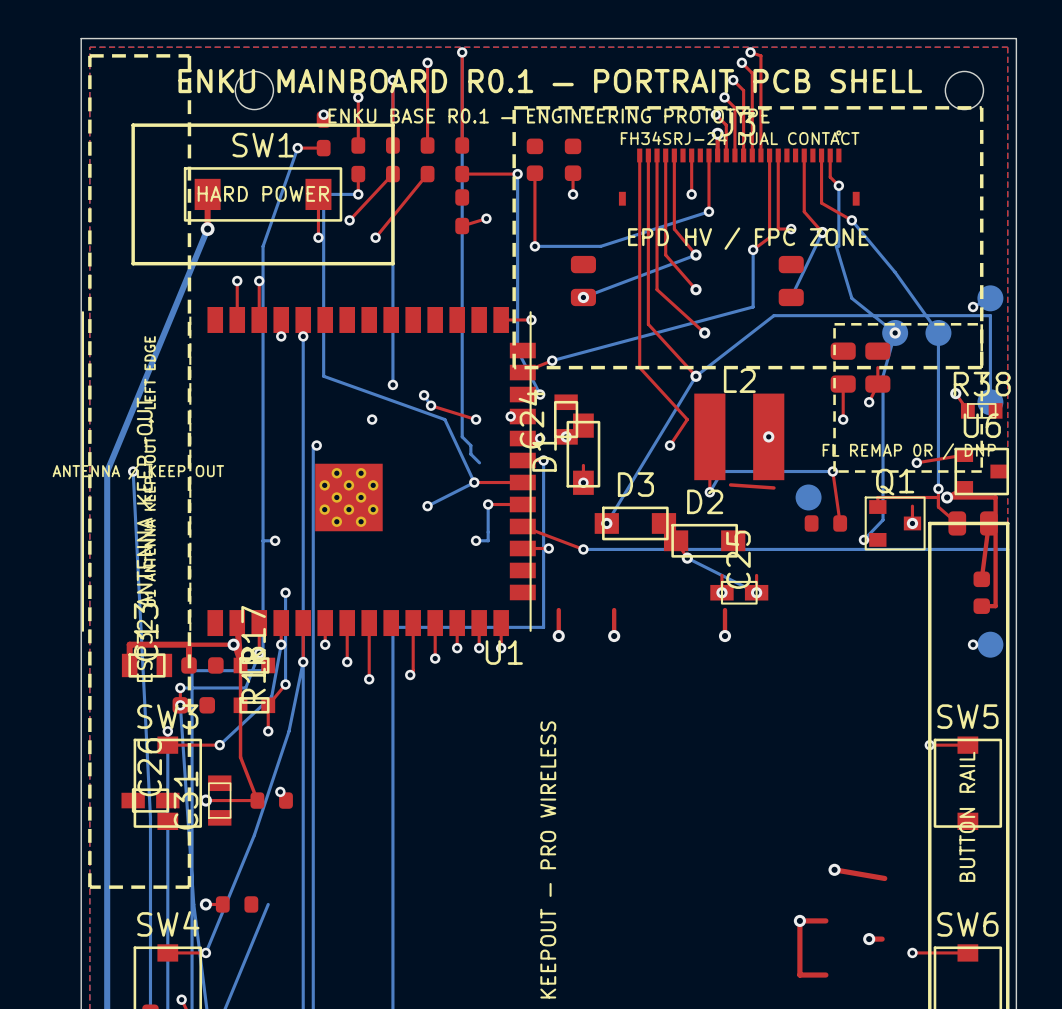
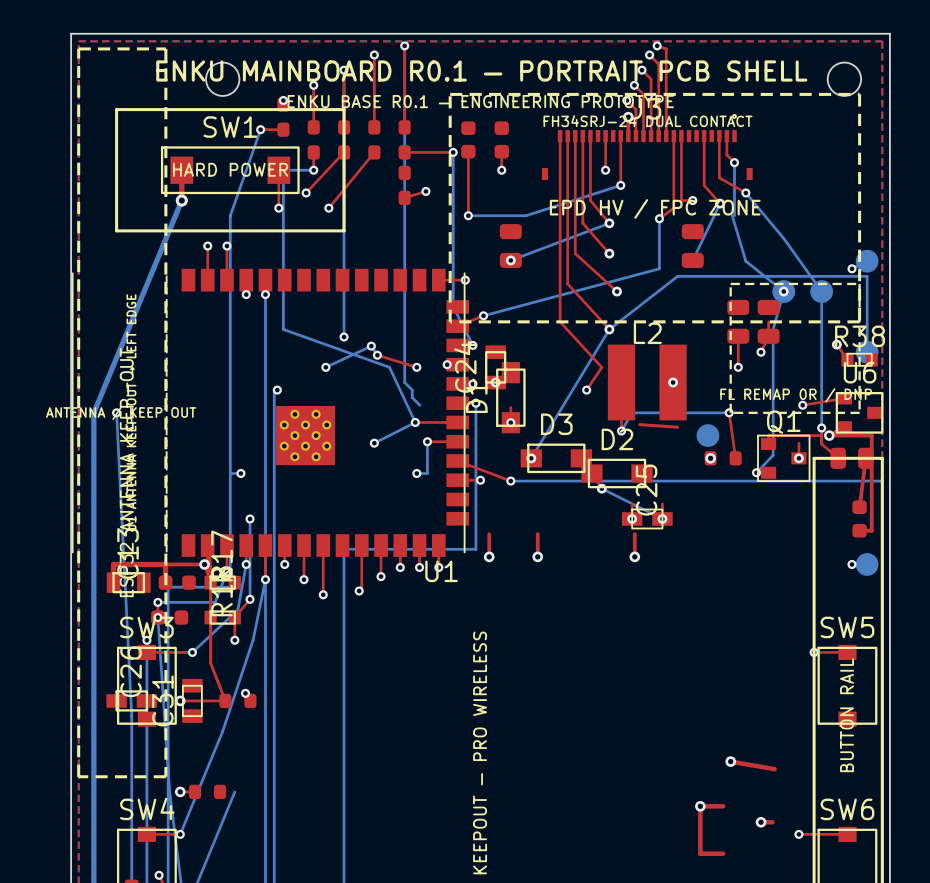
bottom track: none -> (371, 346) (325, 367)
via: none -> (710, 458)

